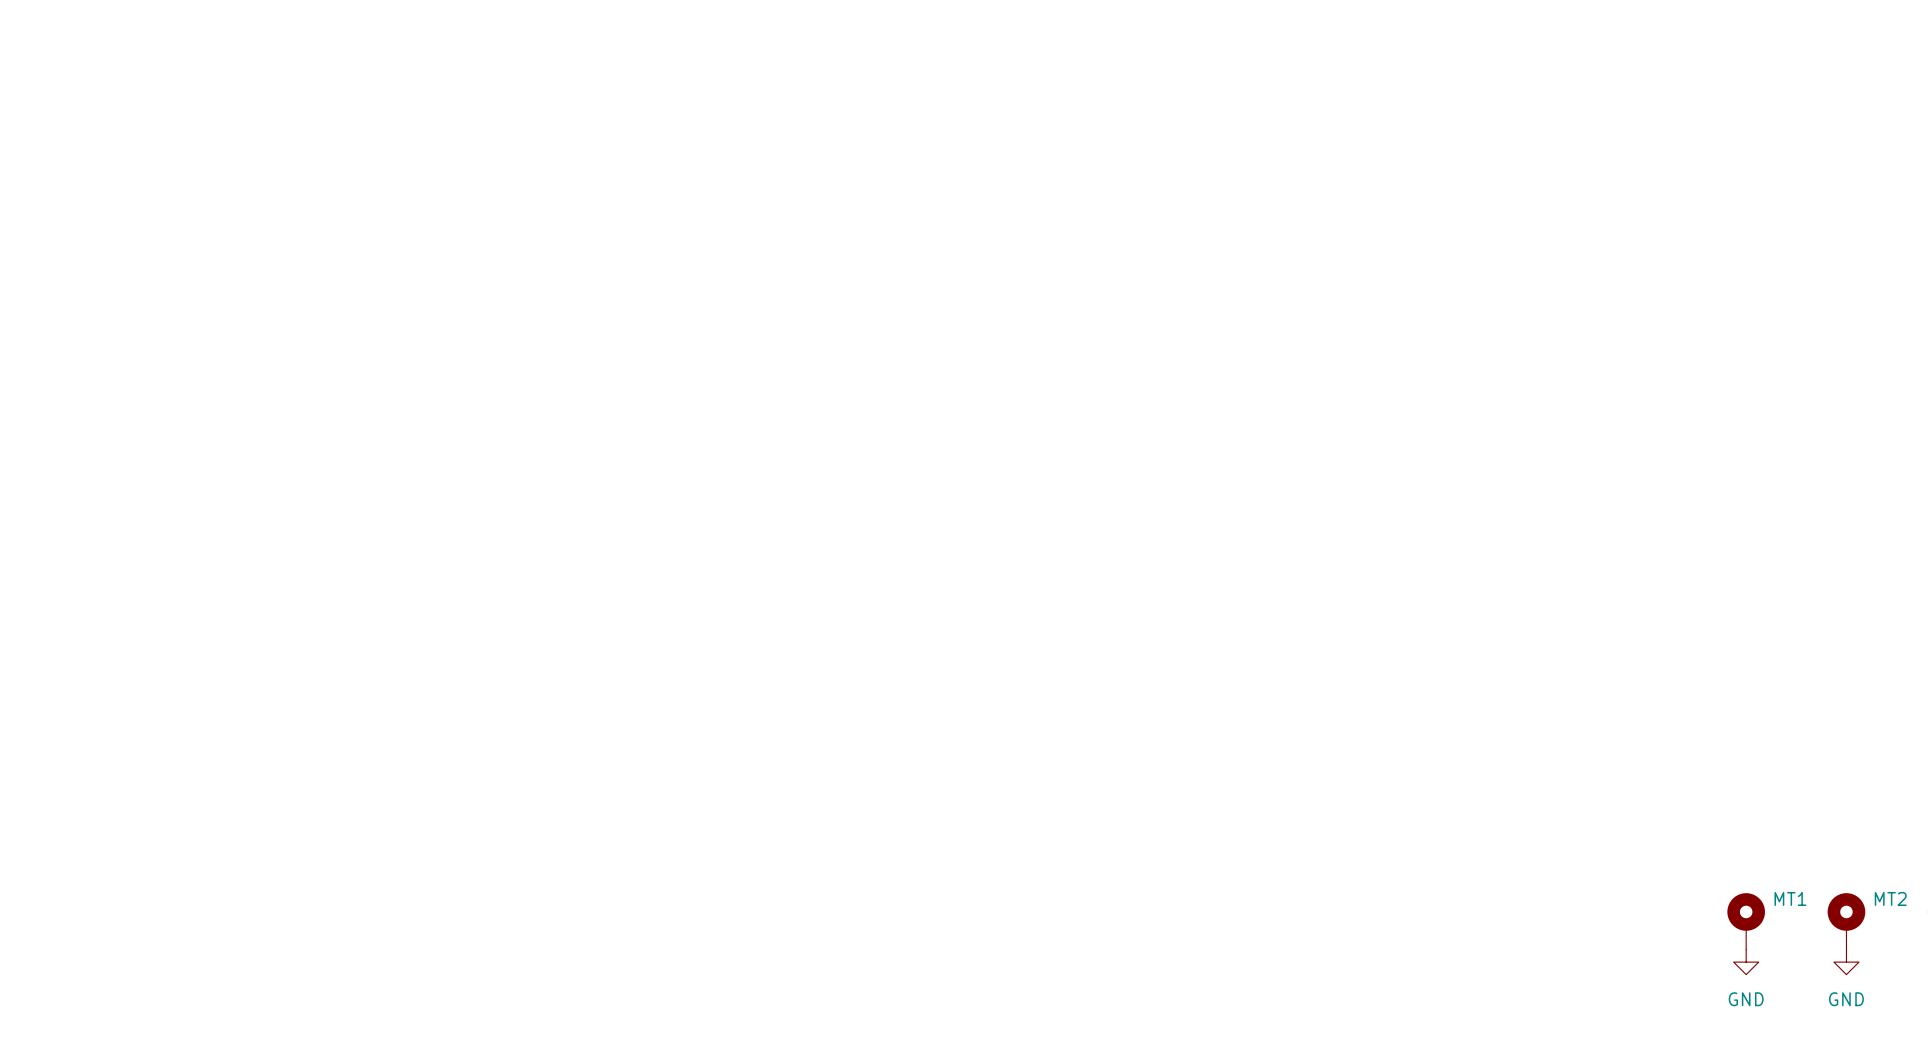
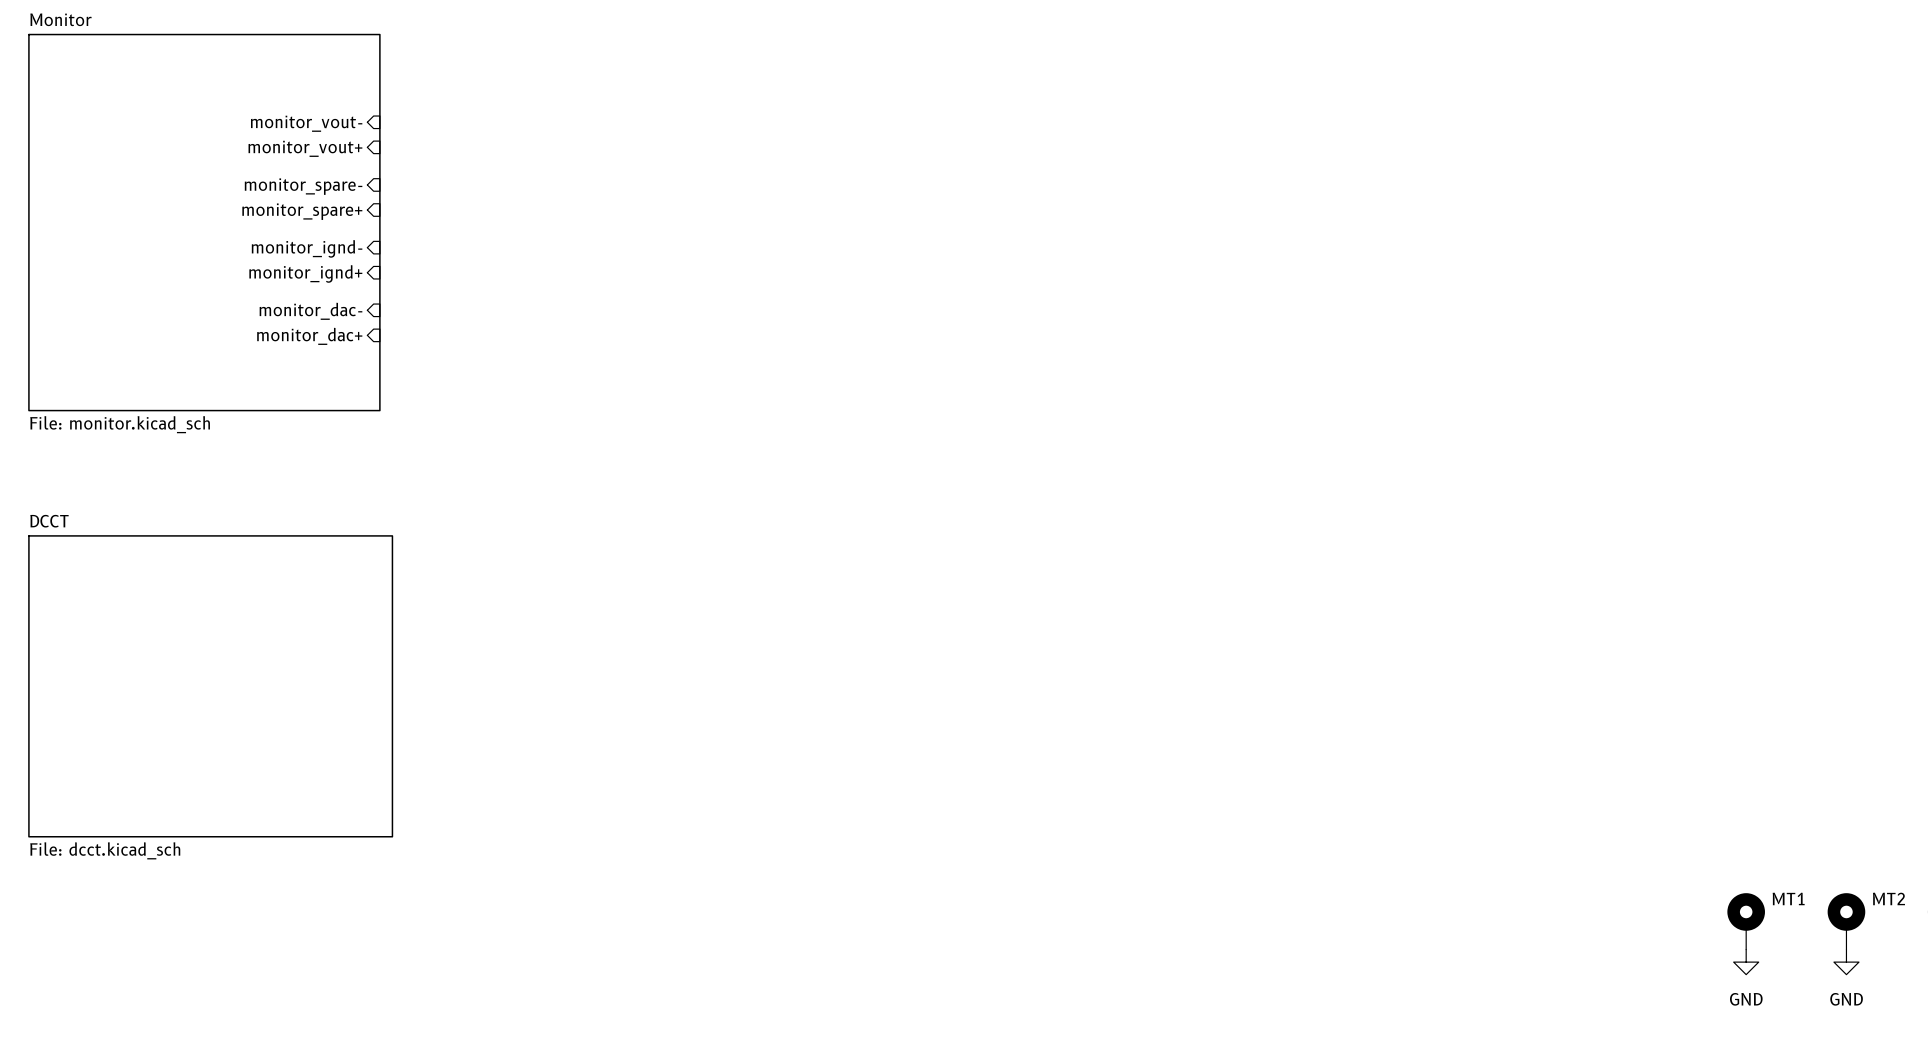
sheet pin: none -> monitor_vout- (306, 123)
sheet pin: none -> monitor_vout+ (305, 148)
sheet pin: none -> monitor_spare- (303, 186)
sheet pin: none -> monitor_spare+ (302, 211)
sheet Monitor: none -> File: monitor.kicad_sch (204, 222)
sheet pin: none -> monitor_ignd- (307, 248)
sheet pin: none -> monitor_ignd+ (305, 273)
sheet pin: none -> monitor_dac- (311, 311)
sheet pin: none -> monitor_dac+ (309, 336)
sheet DCCT: none -> File: dcct.kicad_sch (210, 686)

